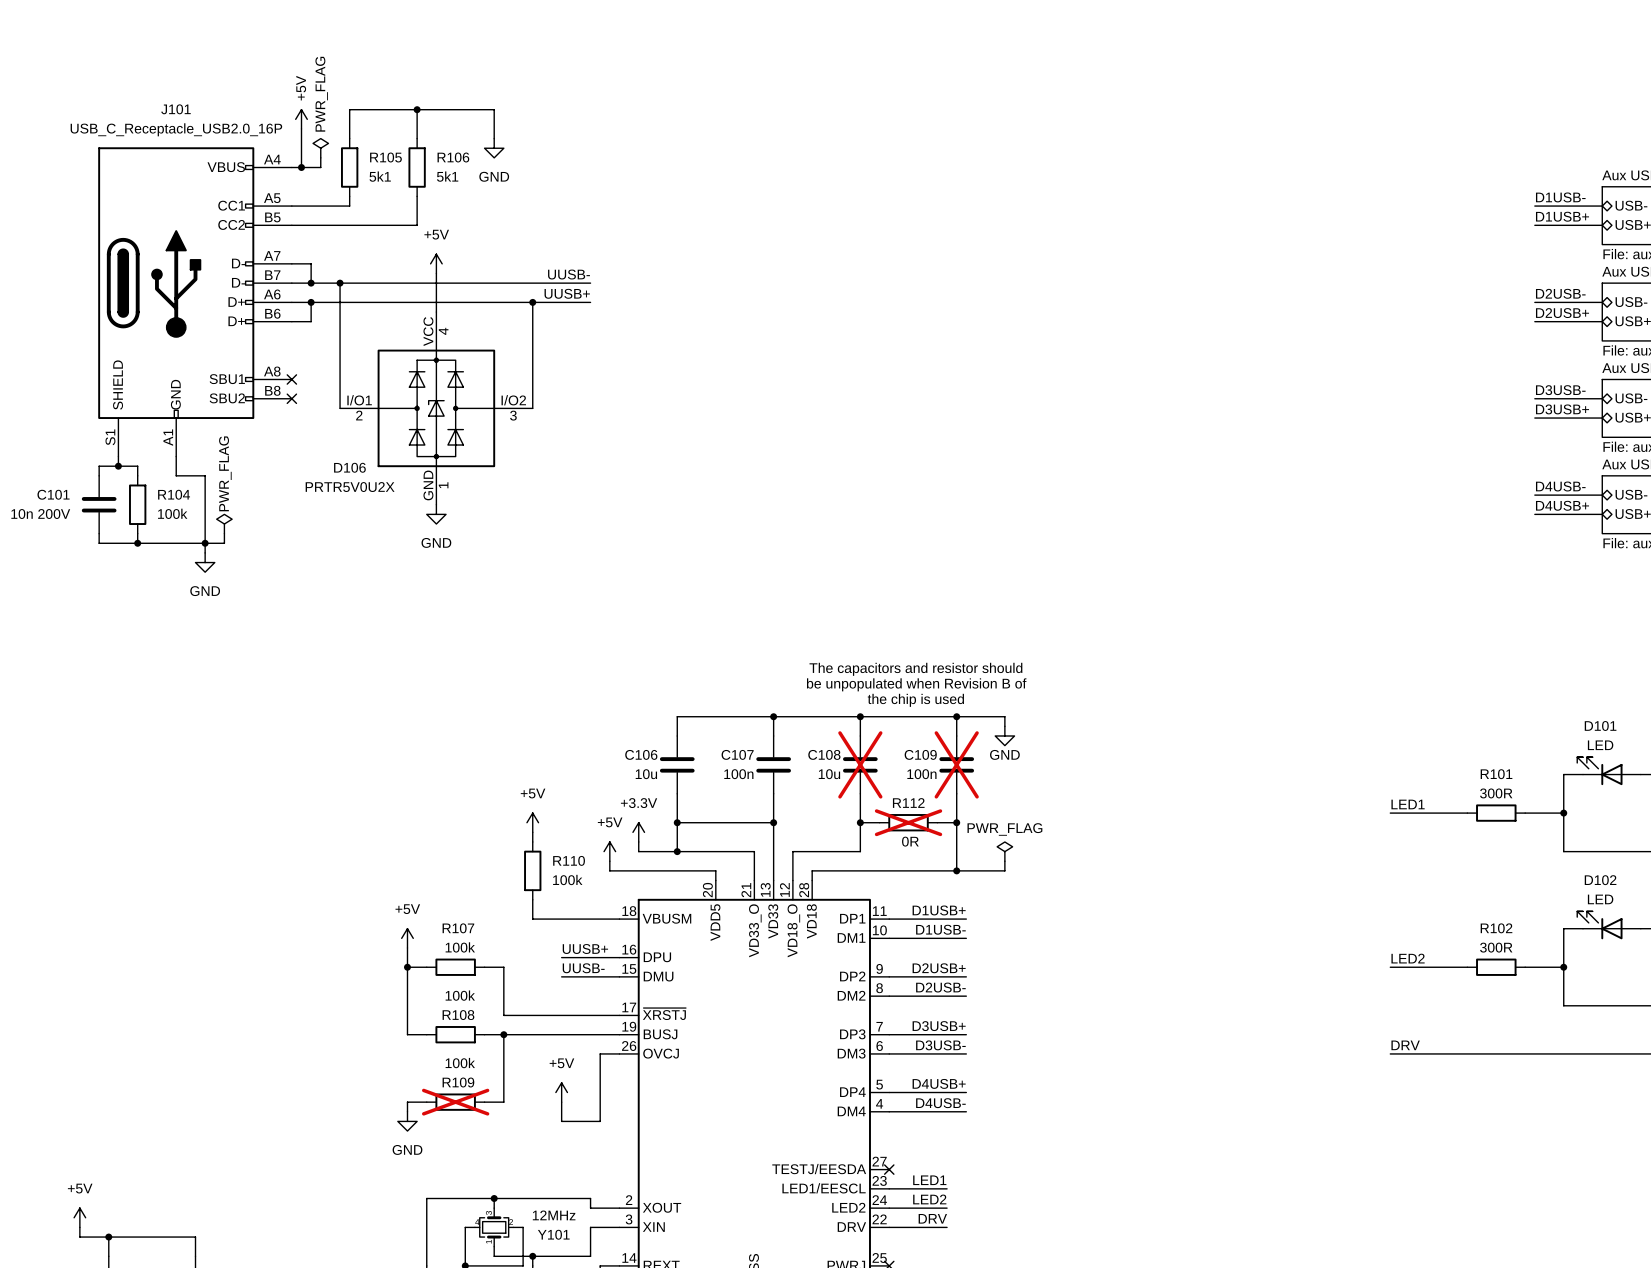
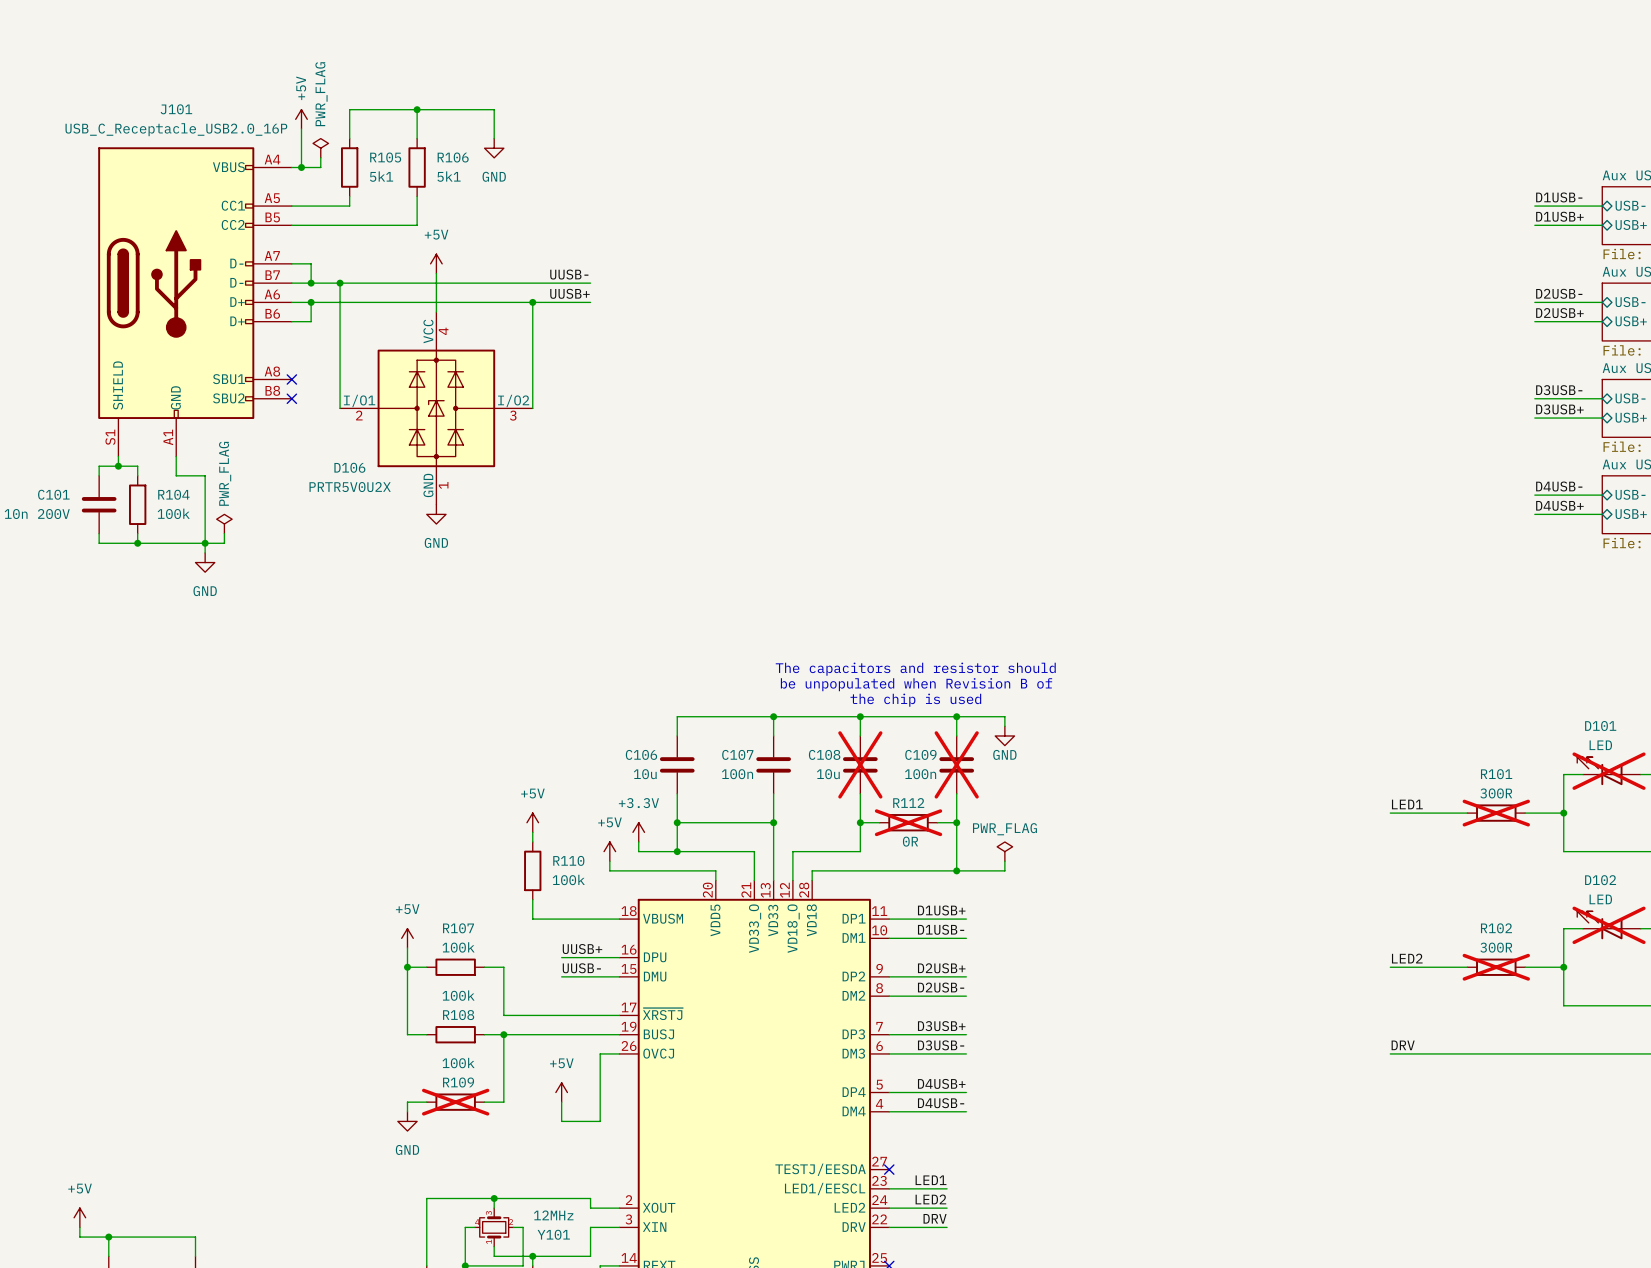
D101 do-not-place cross: none -> (1609, 771)
R101 do-not-place cross: none -> (1496, 813)
D102 do-not-place cross: none -> (1609, 925)
R102 do-not-place cross: none -> (1496, 967)

